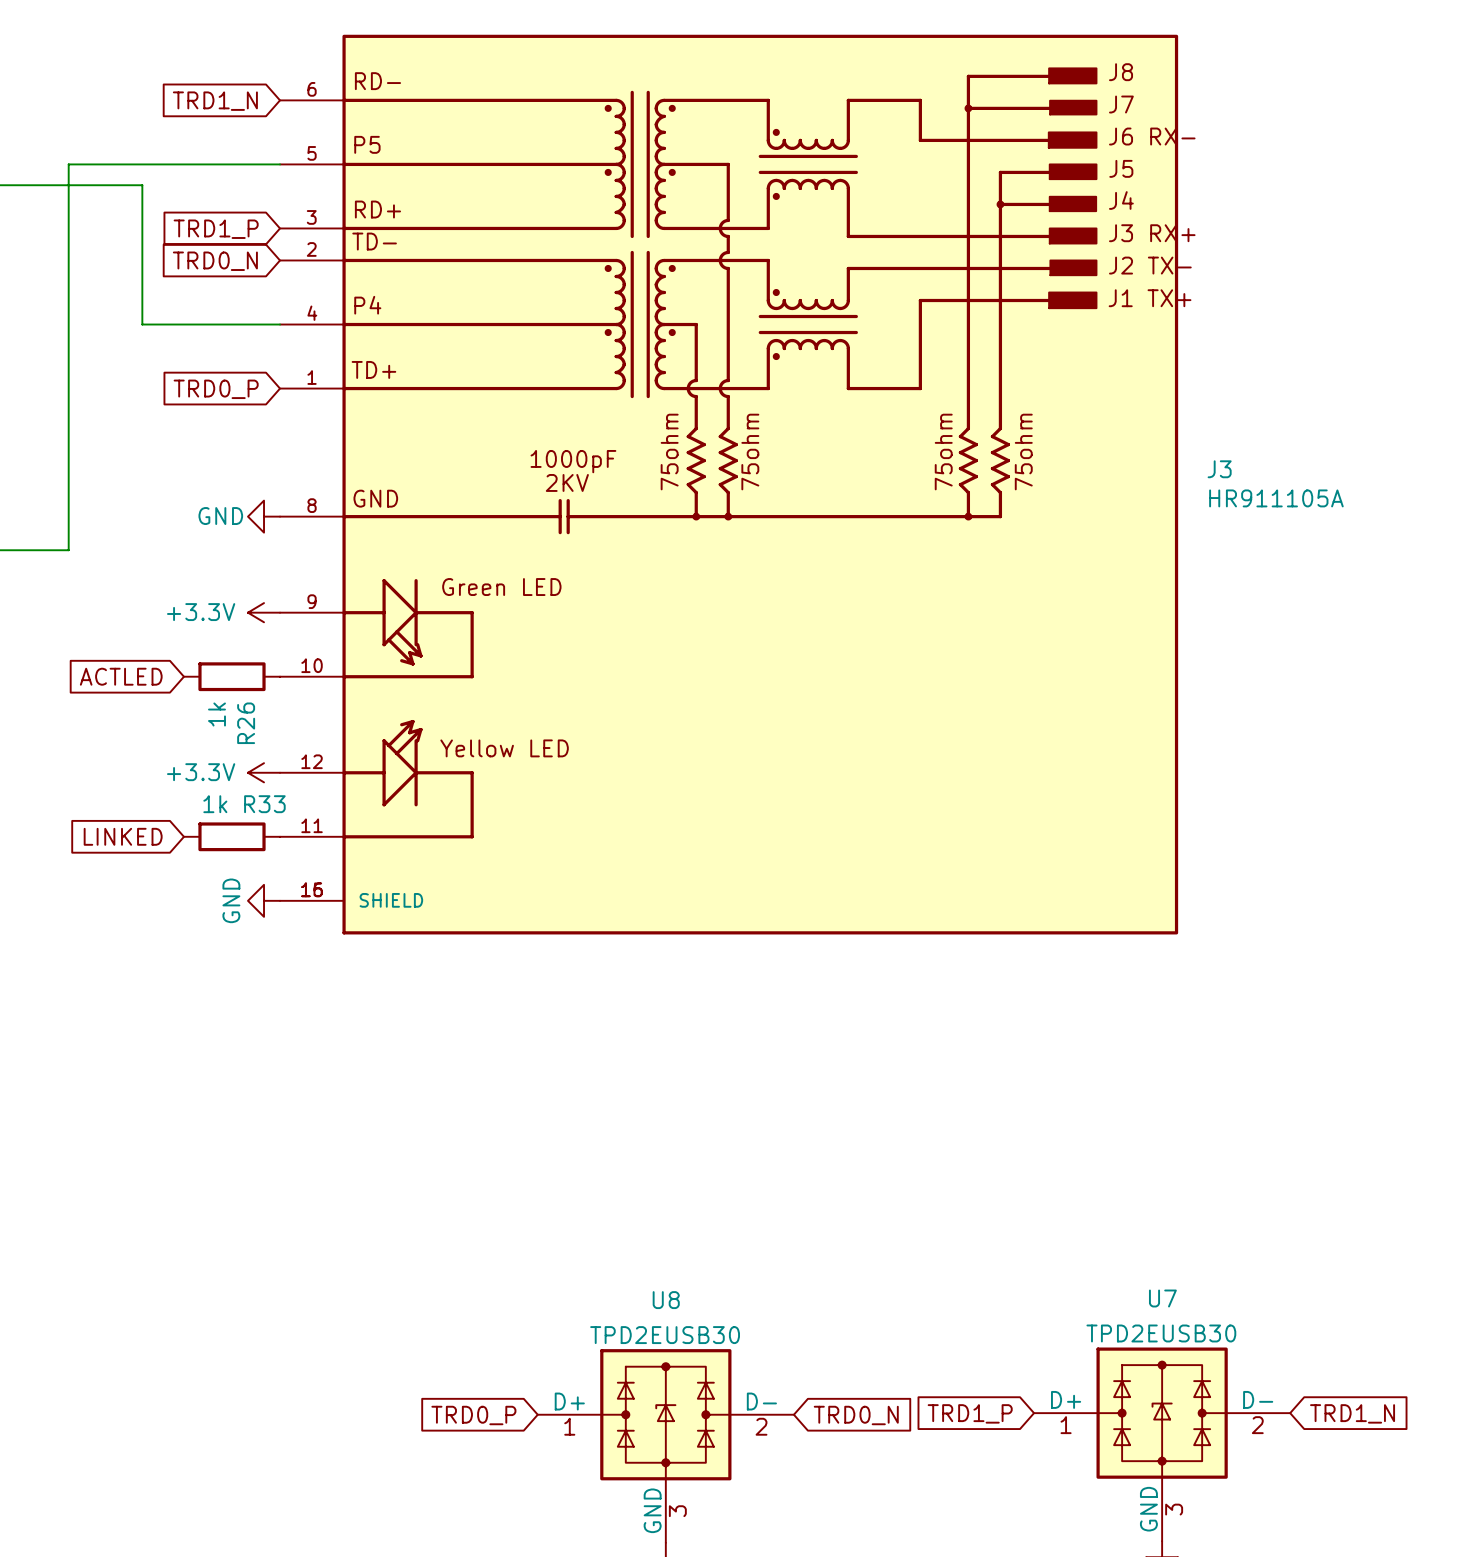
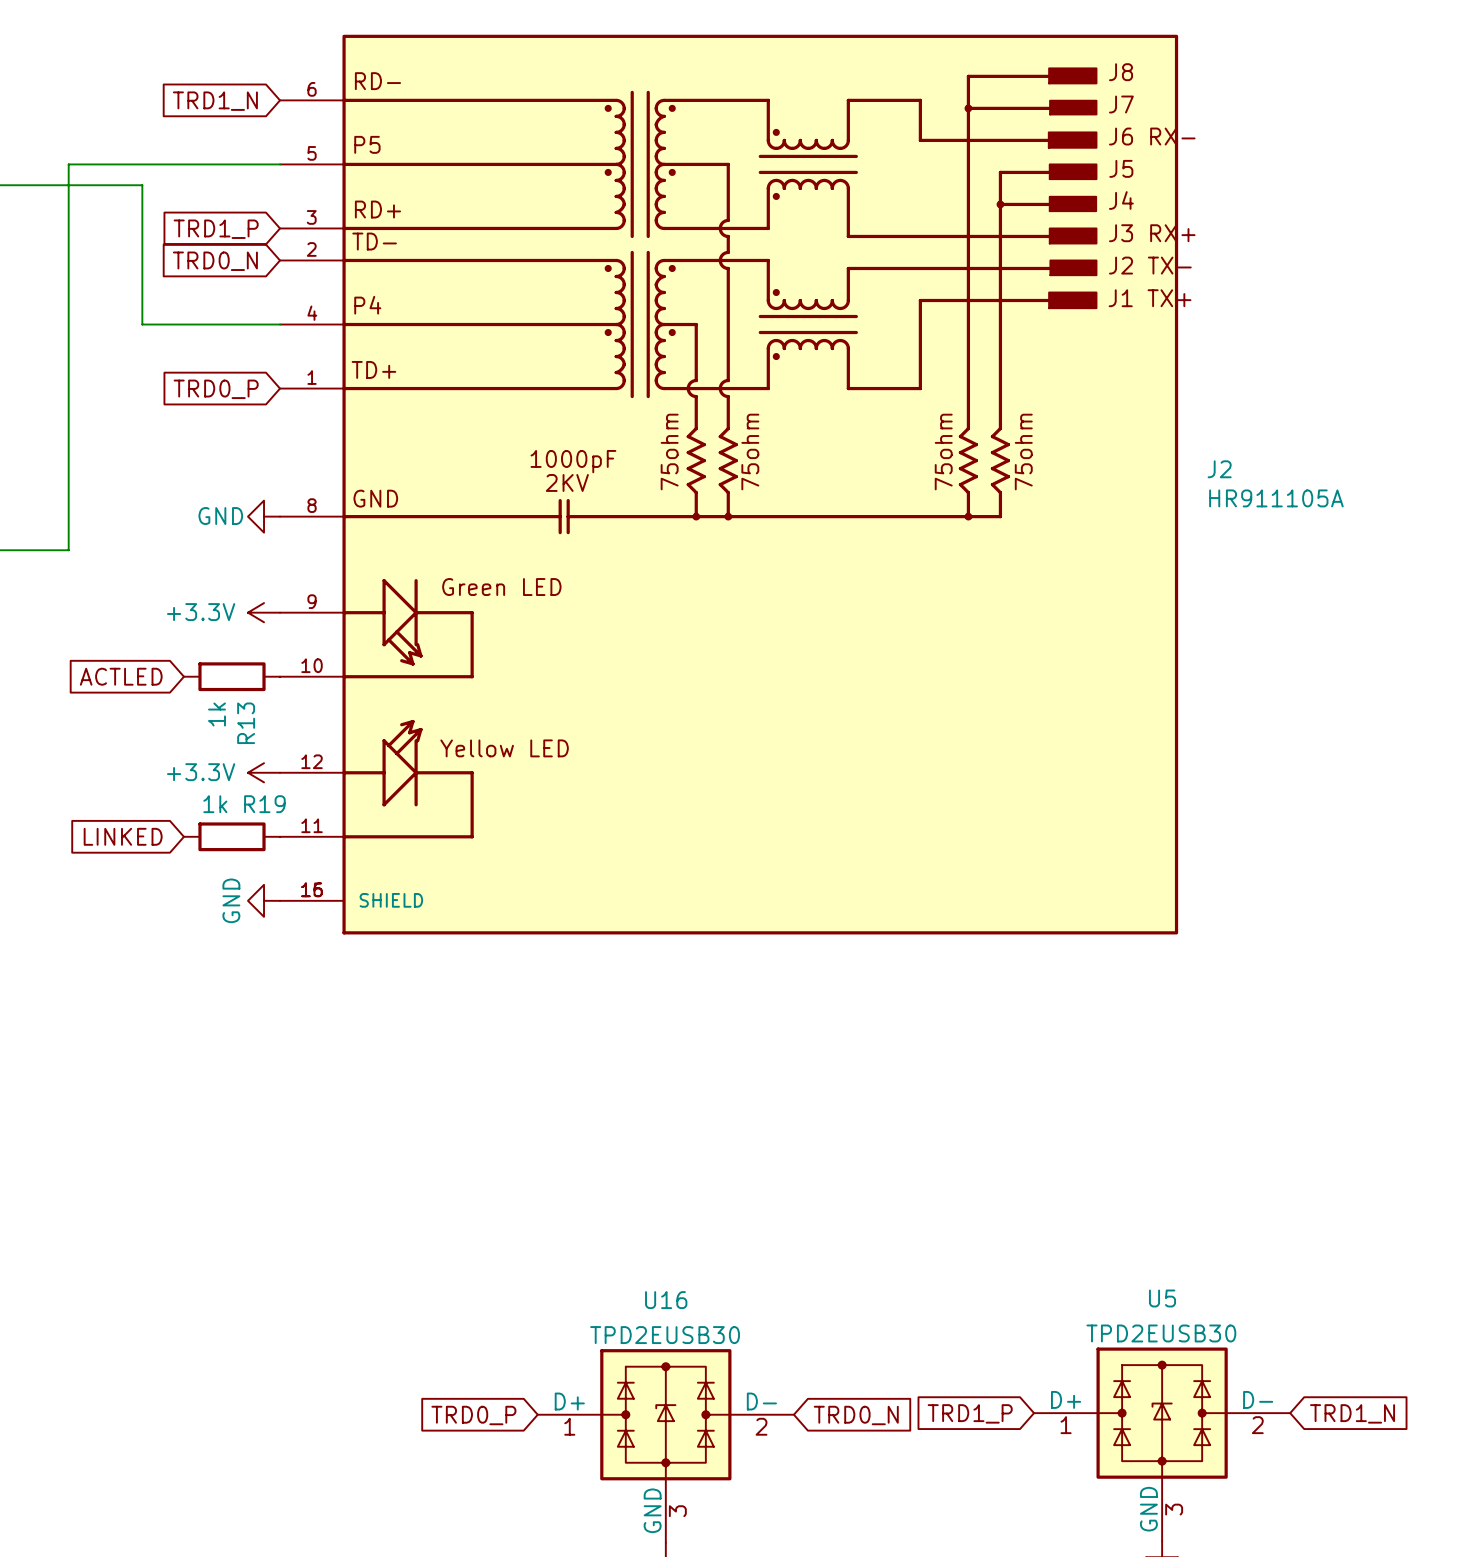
J3 name: J3 (1219, 469) -> J2 (1219, 469)
R26 name: R26 (246, 723) -> R13 (246, 723)
R33 name: R33 (264, 804) -> R19 (264, 804)
U7 name: U7 (1162, 1298) -> U5 (1162, 1298)
U8 name: U8 (666, 1300) -> U16 (666, 1300)

